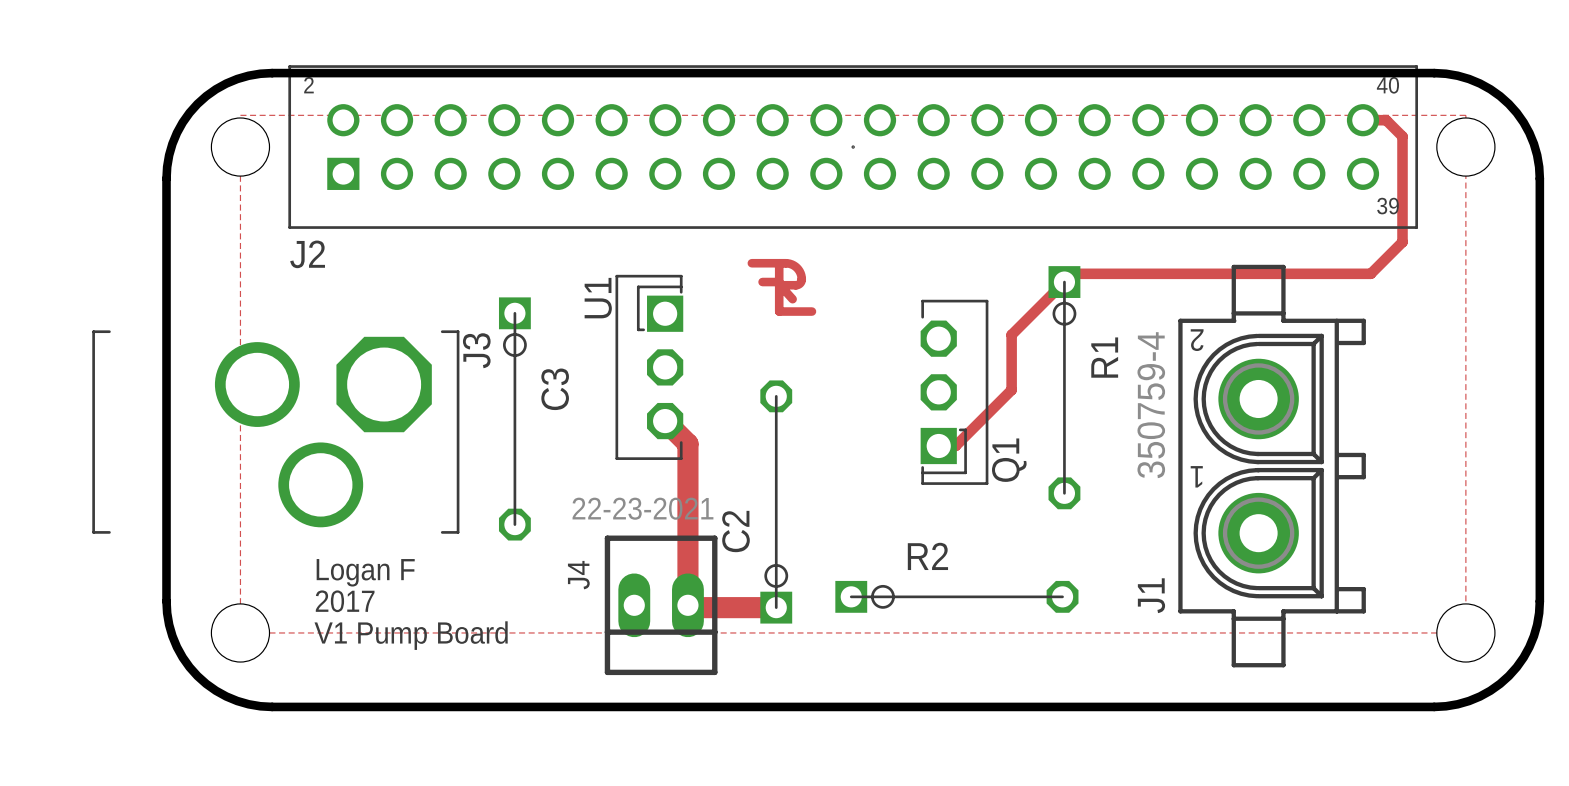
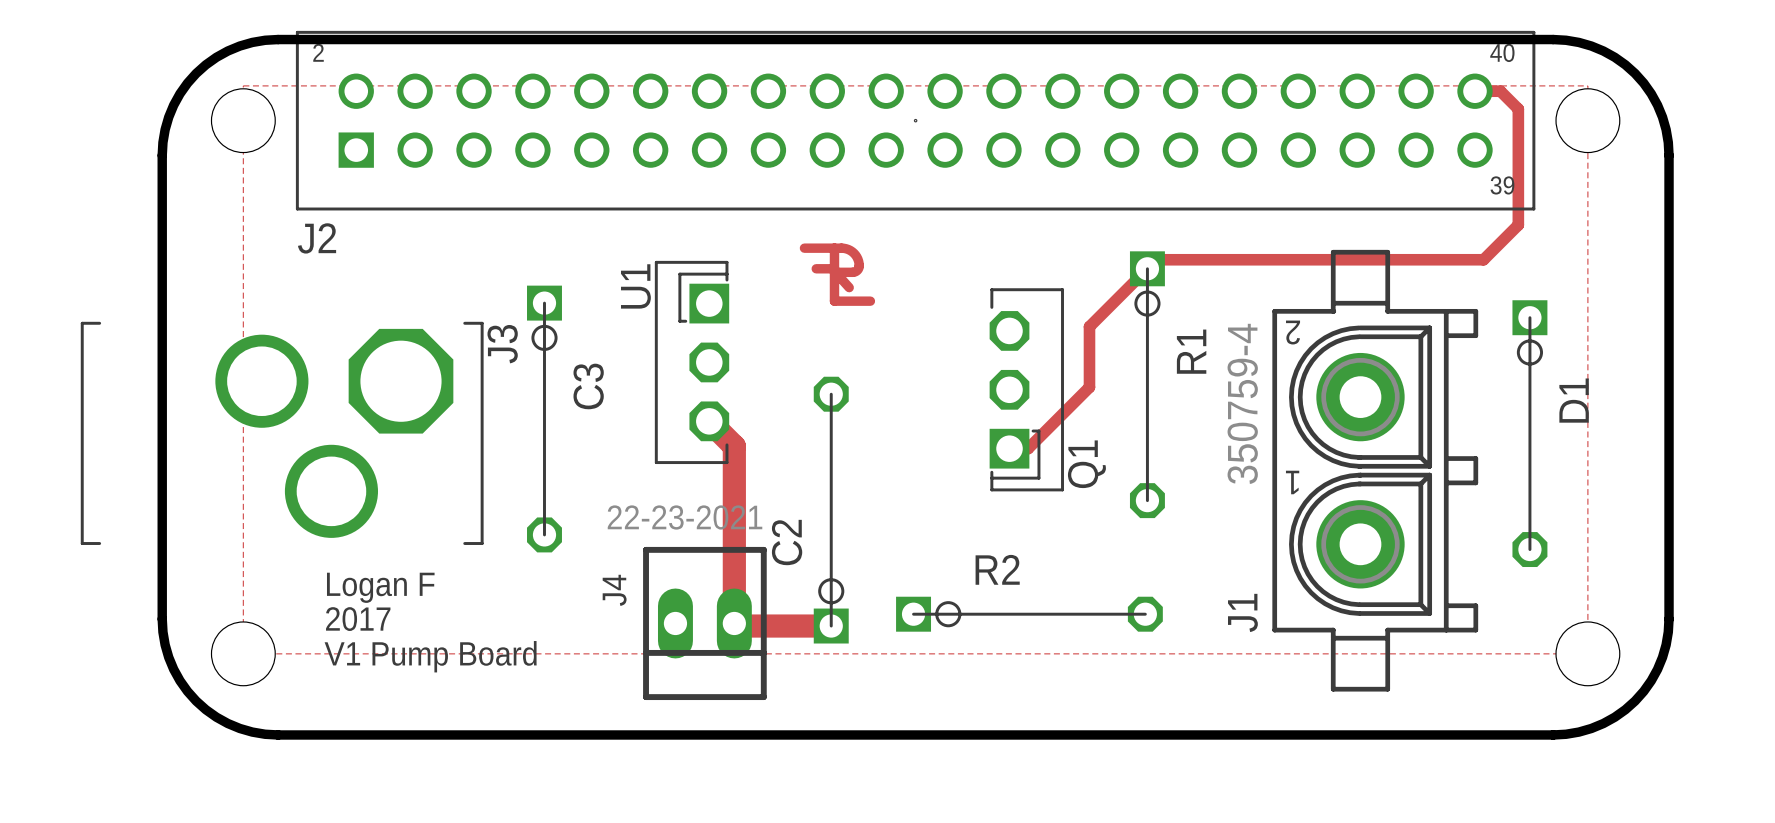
D1: none -> (1529, 433)

